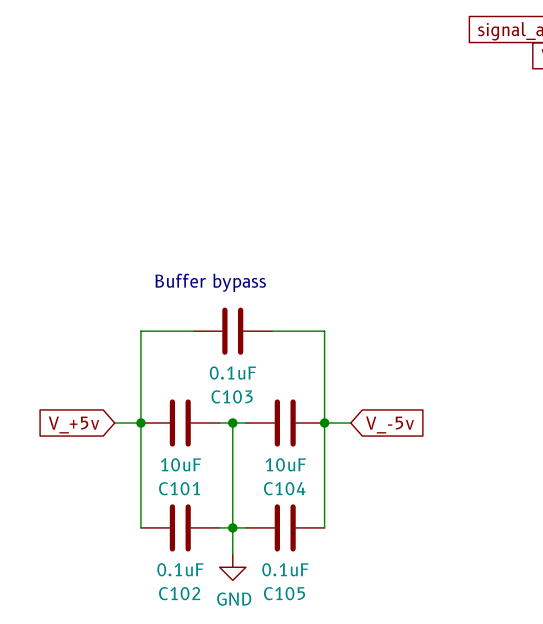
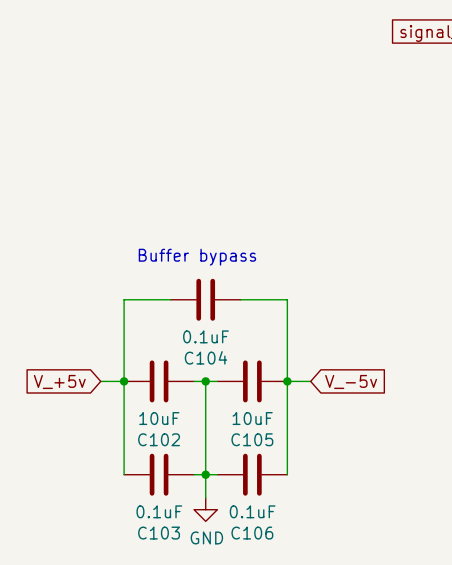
C103 name: C103 (232, 396) -> C104 (205, 357)
C101 name: C101 (179, 488) -> C102 (159, 439)
C104 name: C104 (284, 488) -> C105 (252, 439)
C102 name: C102 (179, 593) -> C103 (159, 533)
C105 name: C105 (284, 593) -> C106 (252, 533)

